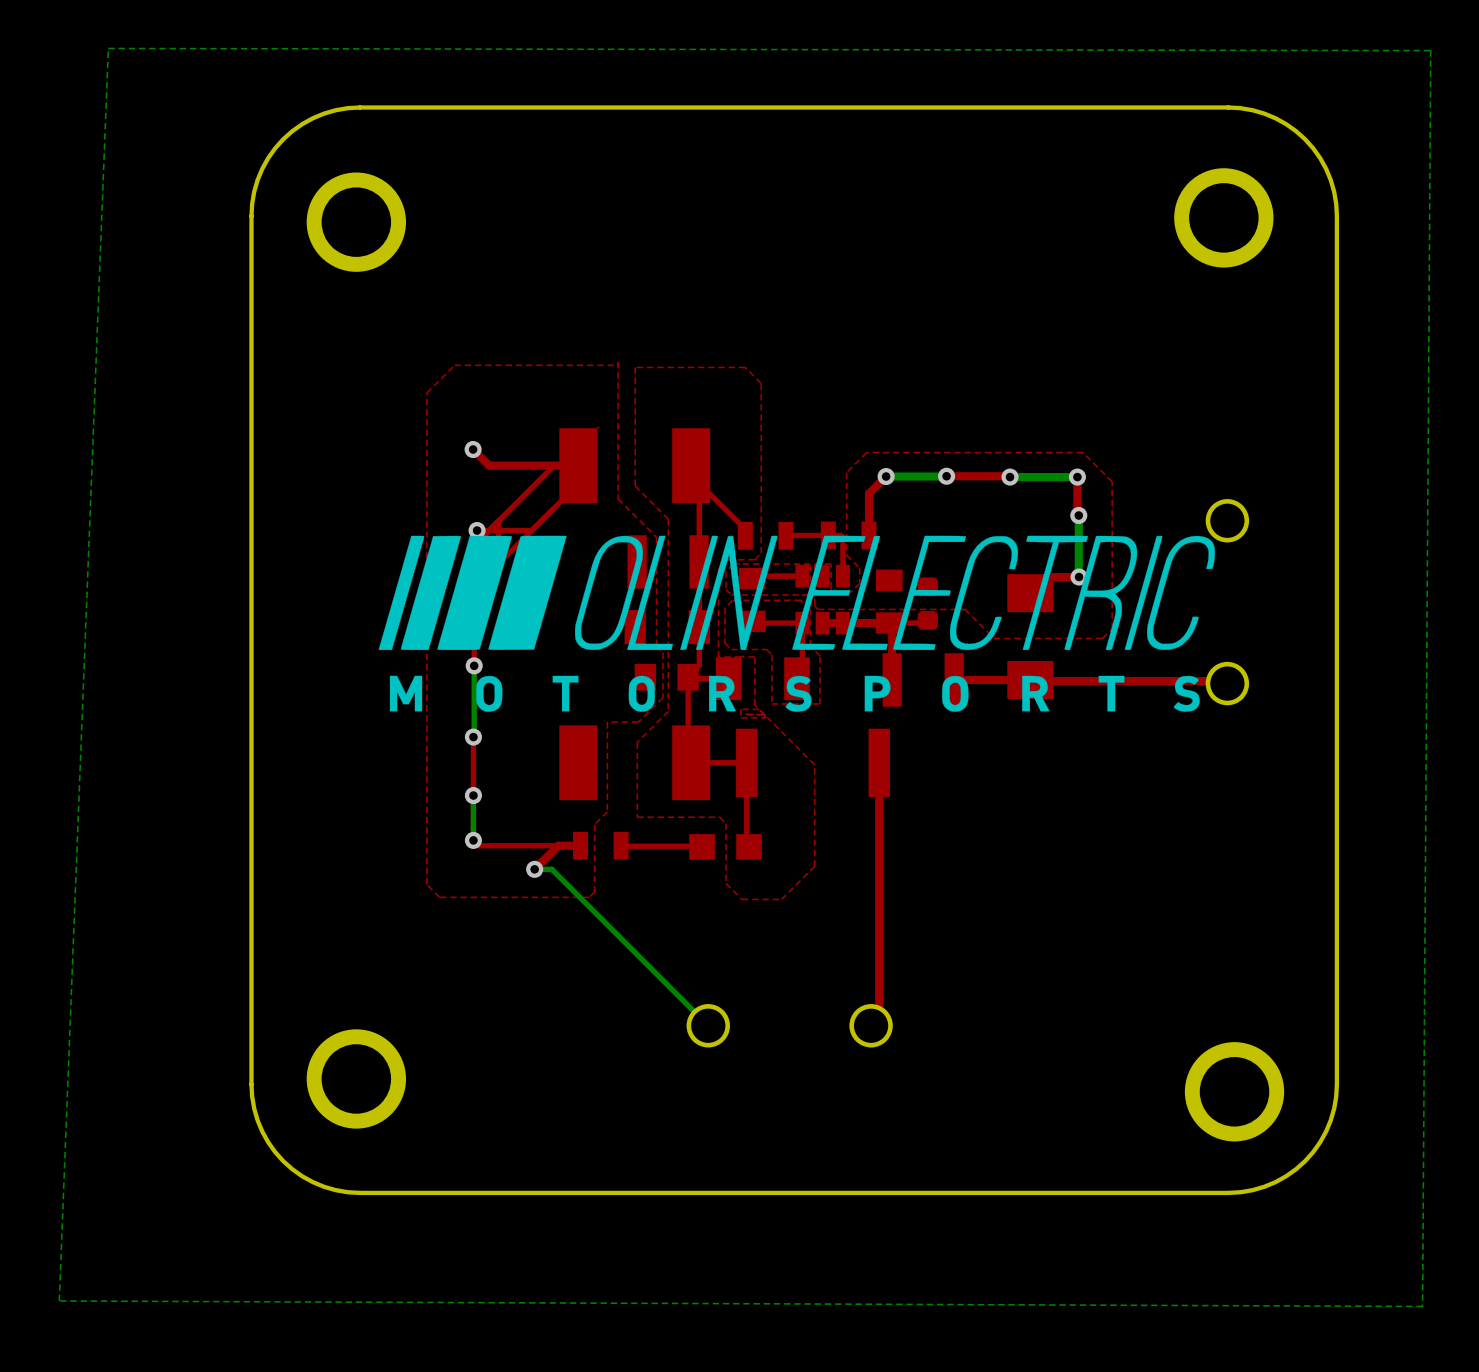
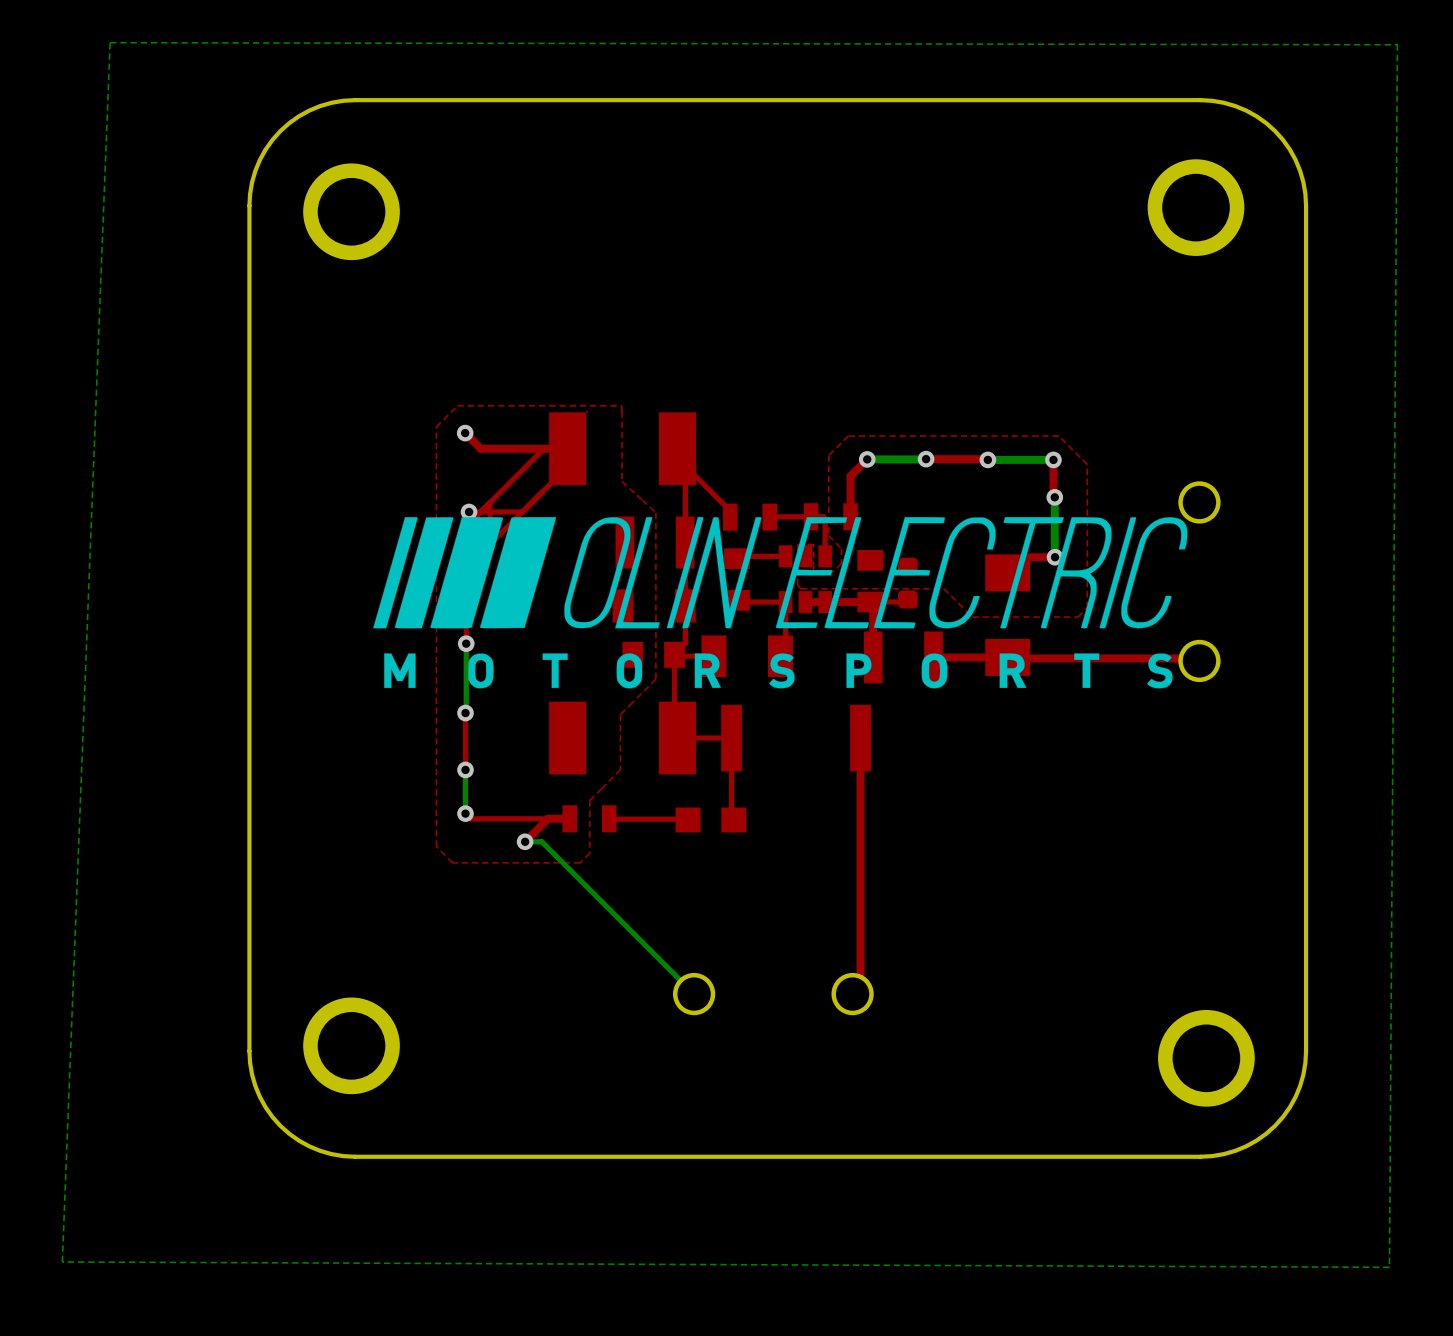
top zone outline: (618, 362) (618, 498) (656, 537) (656, 646) (662, 652) (662, 697) (638, 722) (607, 722) (607, 811) (594, 824) (594, 892) (589, 897) (439, 897) (426, 884) (426, 393) (454, 365) (618, 365) -> none
top zone outline: (745, 367) (761, 383) (761, 553) (754, 559) (728, 559) (718, 569) (718, 656) (754, 656) (754, 705) (814, 764) (814, 866) (781, 899) (742, 899) (725, 883) (725, 823) (719, 817) (637, 817) (637, 742) (668, 711) (668, 519) (635, 486) (635, 367) (745, 367) -> none
top zone outline: none -> (621, 411) (621, 405) (457, 405) (436, 426) (436, 846) (452, 862) (580, 862) (589, 853) (589, 800) (620, 769) (620, 714) (655, 679) (655, 512) (622, 481) (622, 411)
top zone outline: (810, 564) (733, 564) (725, 571) (725, 589) (731, 595) (807, 595) (810, 591) (810, 564) -> none
top zone outline: (800, 600) (810, 609) (810, 646) (820, 655) (820, 703) (771, 703) (771, 654) (766, 649) (731, 649) (724, 643) (724, 607) (732, 600) (800, 600) -> none
top zone outline: (759, 709) (740, 709) (740, 717) (765, 717) (765, 715) -> none
top zone outline: (745, 714) (746, 714) (764, 714) (745, 714) -> none

